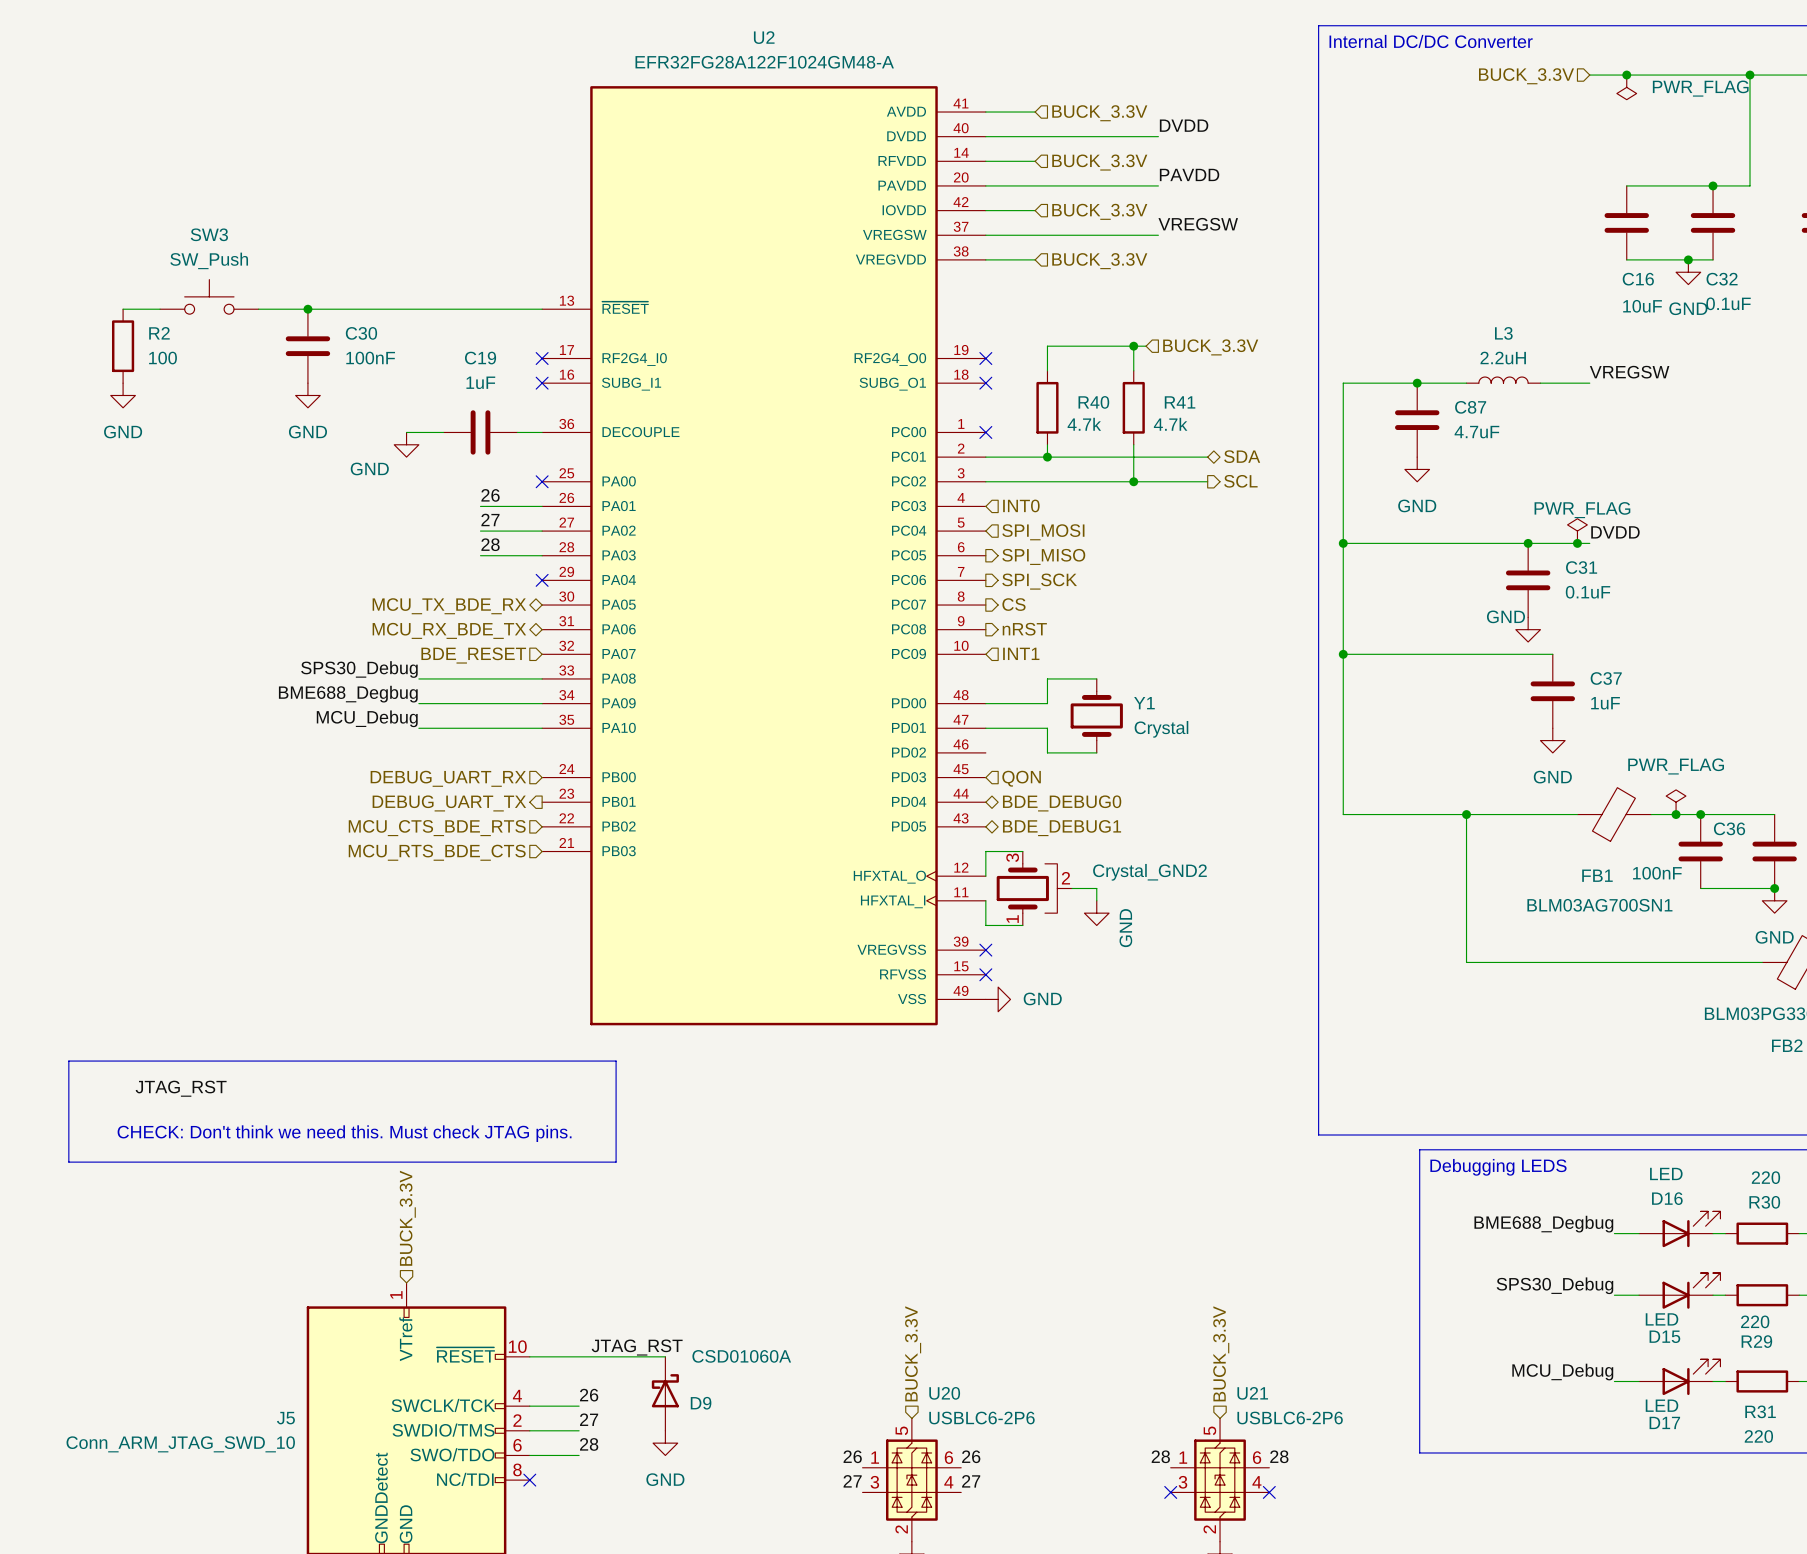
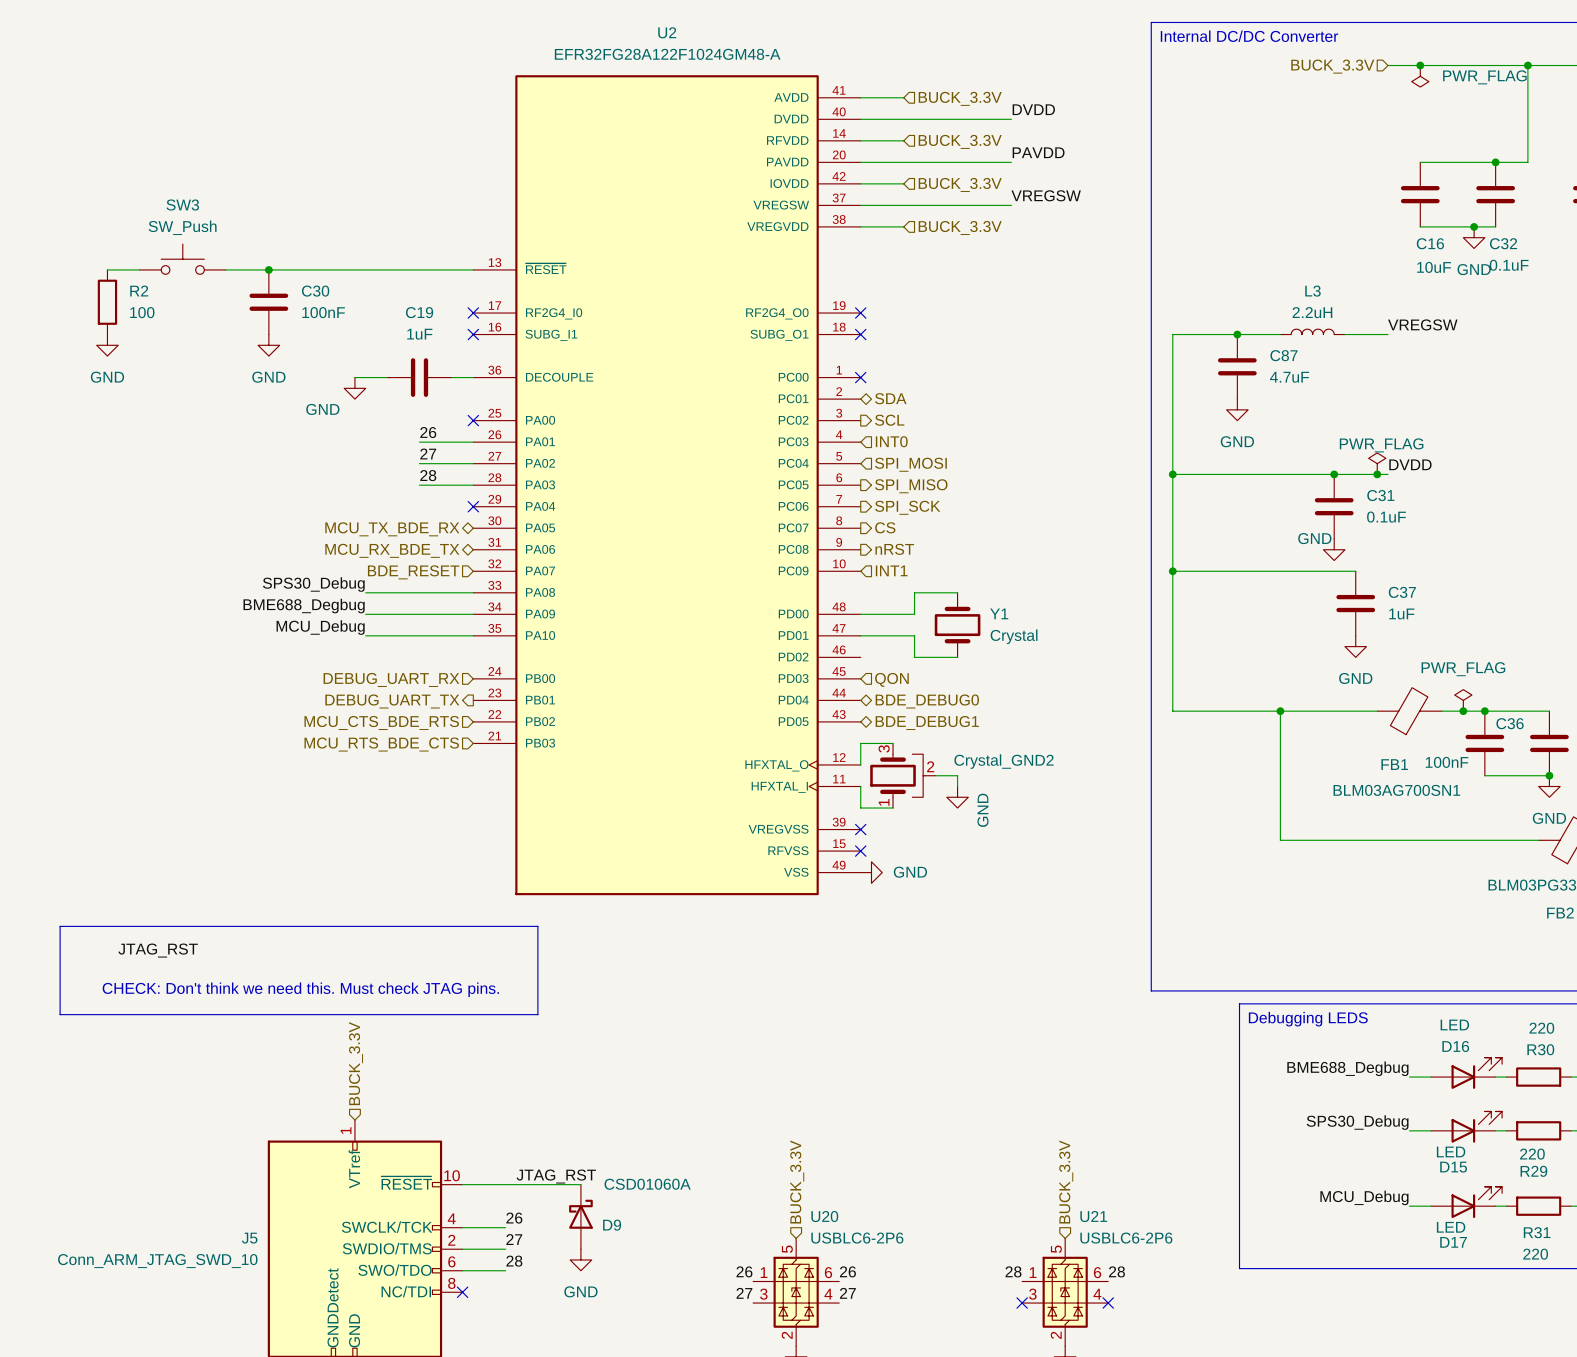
wire: (1133, 346) (1133, 370) -> none
junction: (1133, 346) -> none
wire: (1146, 346) (1047, 346) (1047, 370) -> none
hierarchical label: BUCK_3.3V (1210, 347) -> none
R40: 4.7k (1047, 407) -> none
R41: 4.7k (1133, 407) -> none
wire: (1047, 444) (1047, 457) -> none
wire: (1133, 444) (1133, 481) -> none
hierarchical label position: SDA (1242, 456) -> SDA (890, 398)
wire: (985, 457) (1207, 457) -> none
junction: (1047, 457) -> none
wire: (985, 481) (1207, 481) -> none
junction: (1133, 481) -> none
hierarchical label position: SCL (1240, 481) -> SCL (889, 420)

